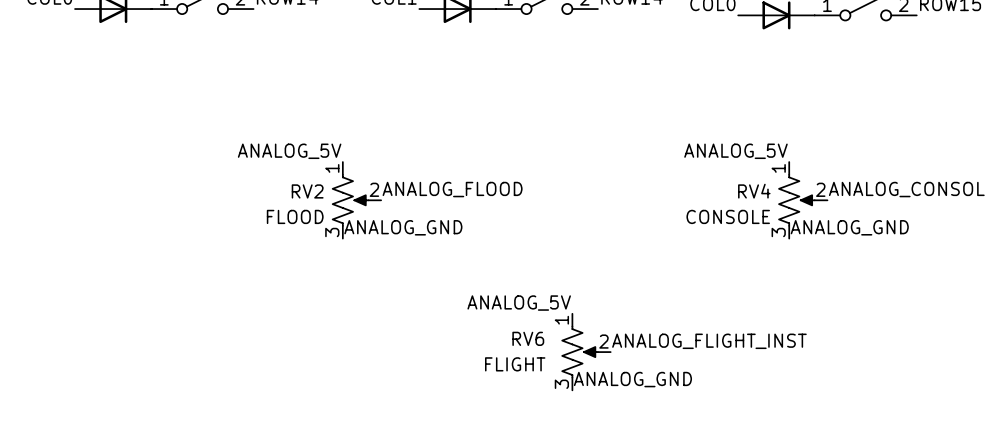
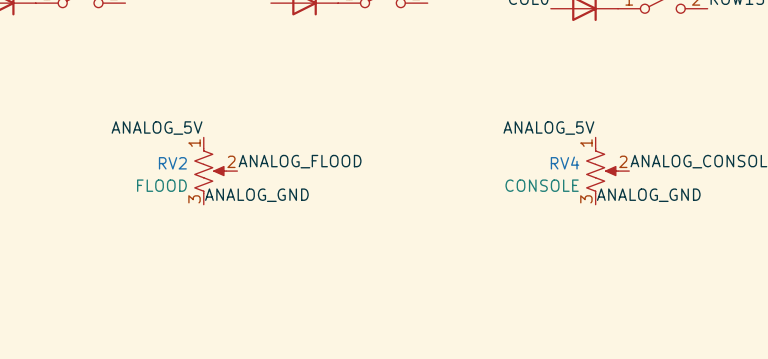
label: ANALOG_5V (519, 303) -> none
label: ANALOG_FLIGHT_INST (709, 341) -> none
RV6: FLIGHT (586, 352) -> none
label: ANALOG_GND (632, 379) -> none

